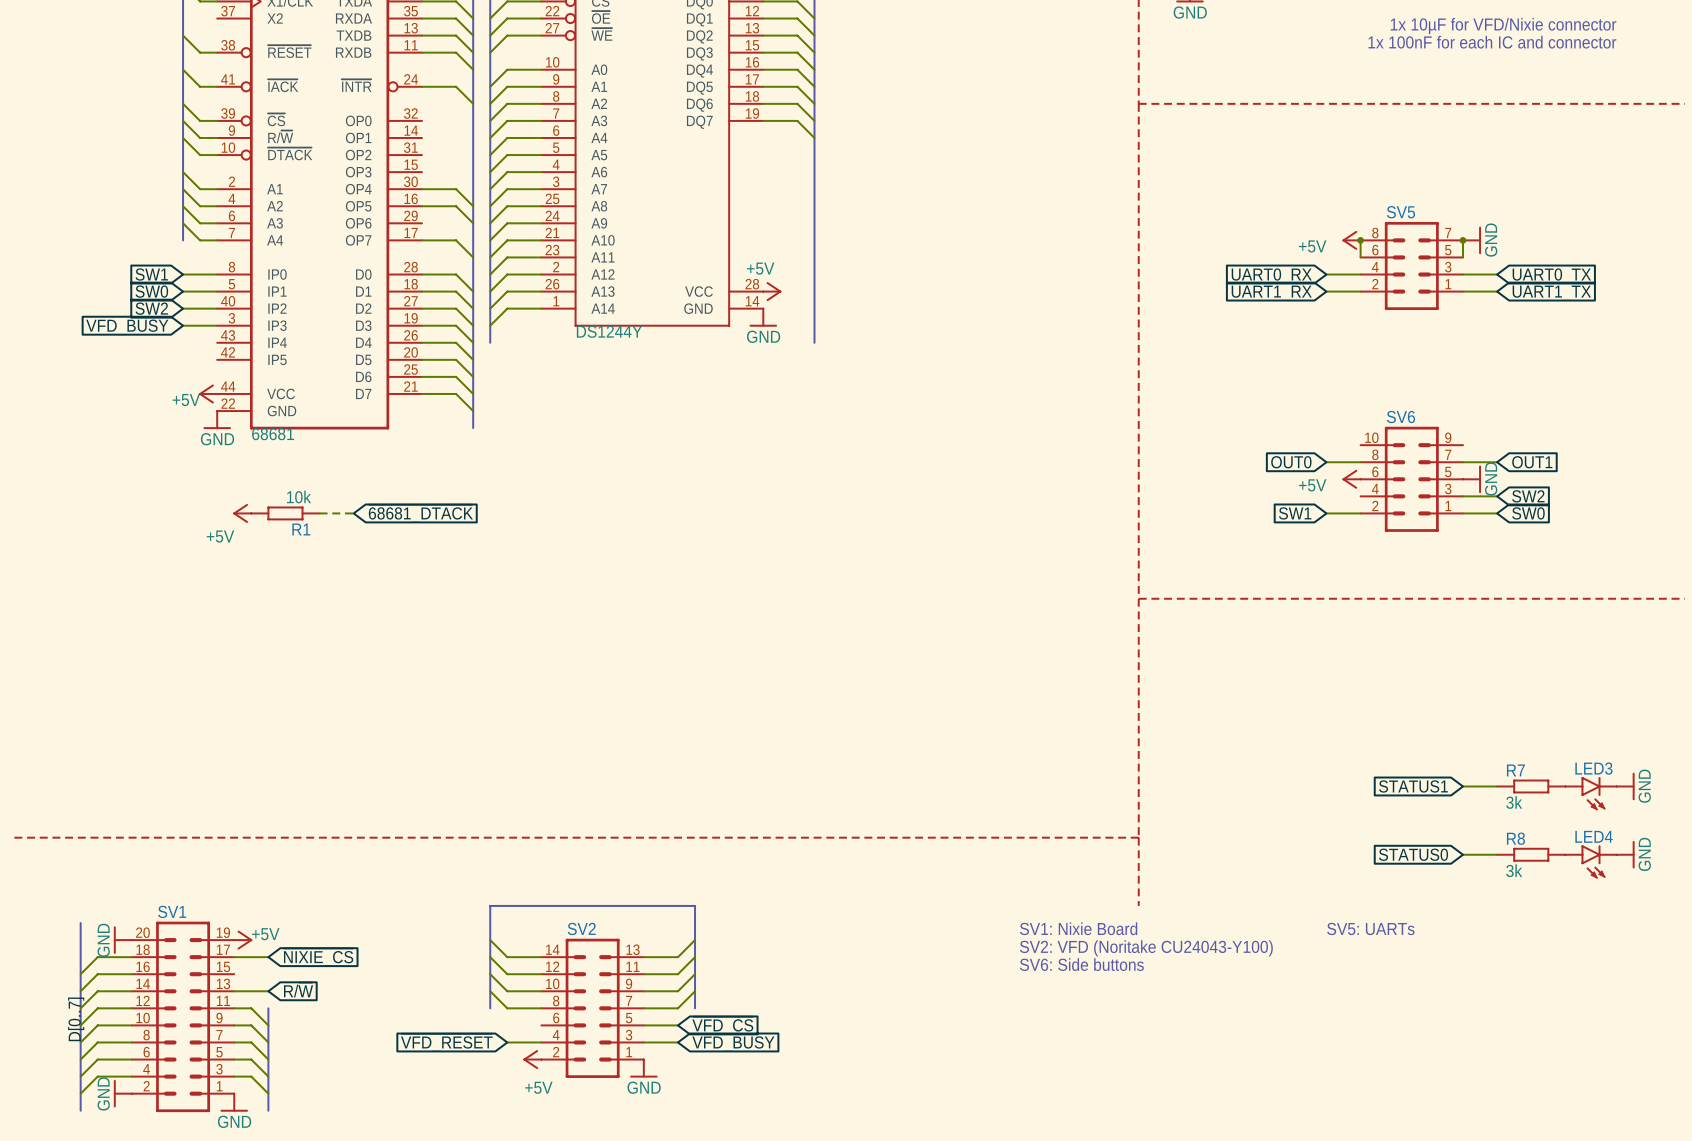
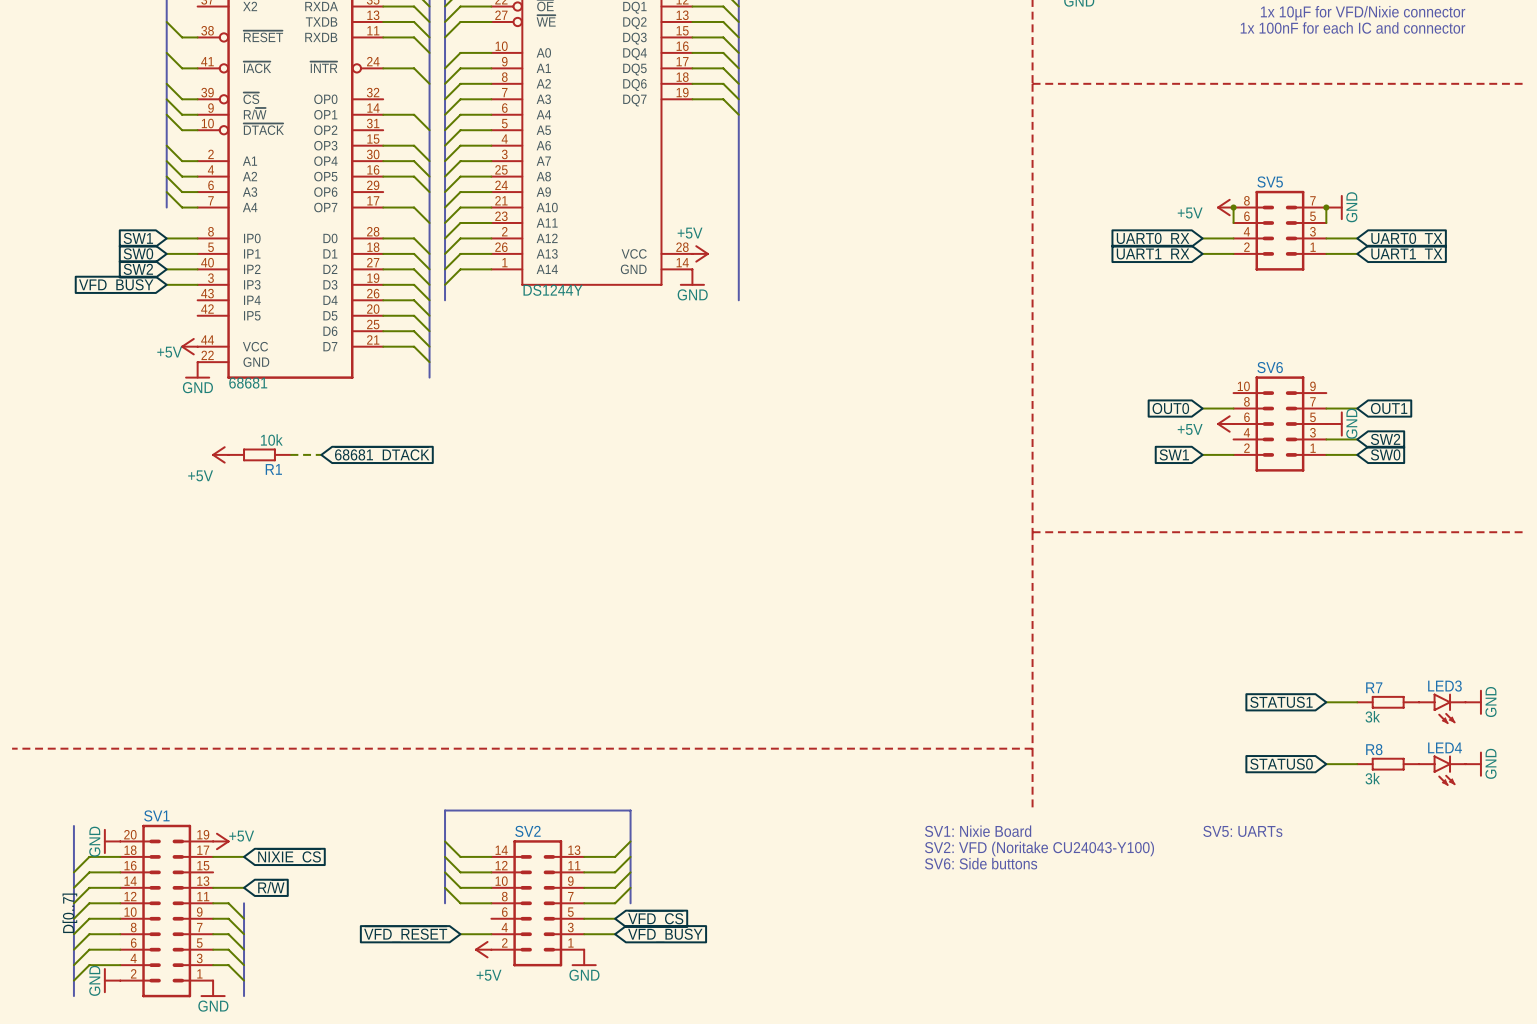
wire: none -> (383, 114) (414, 114) (429, 130)
wire: none -> (383, 145) (414, 145) (429, 161)

